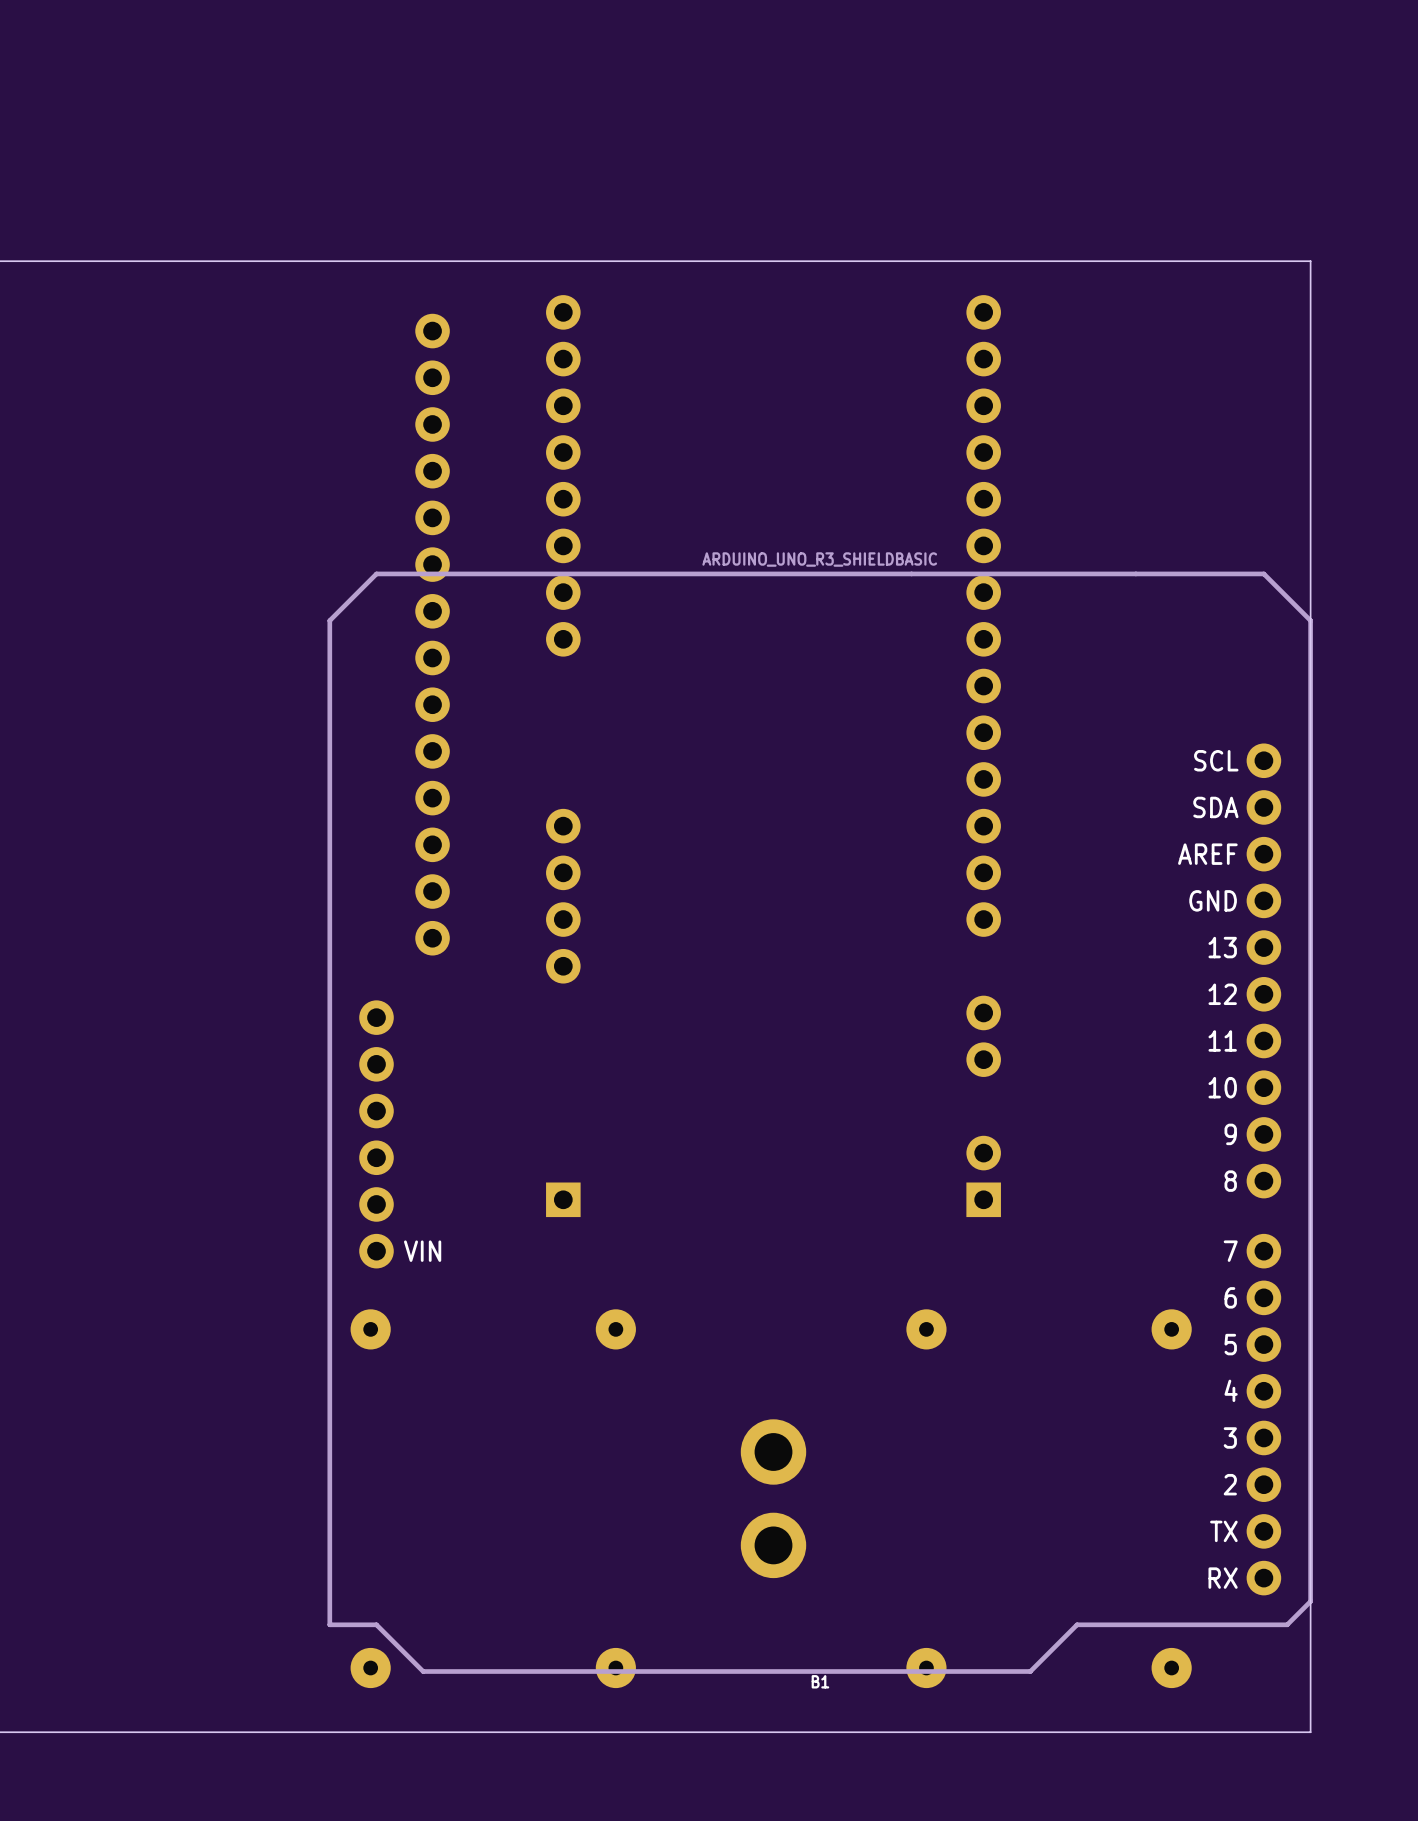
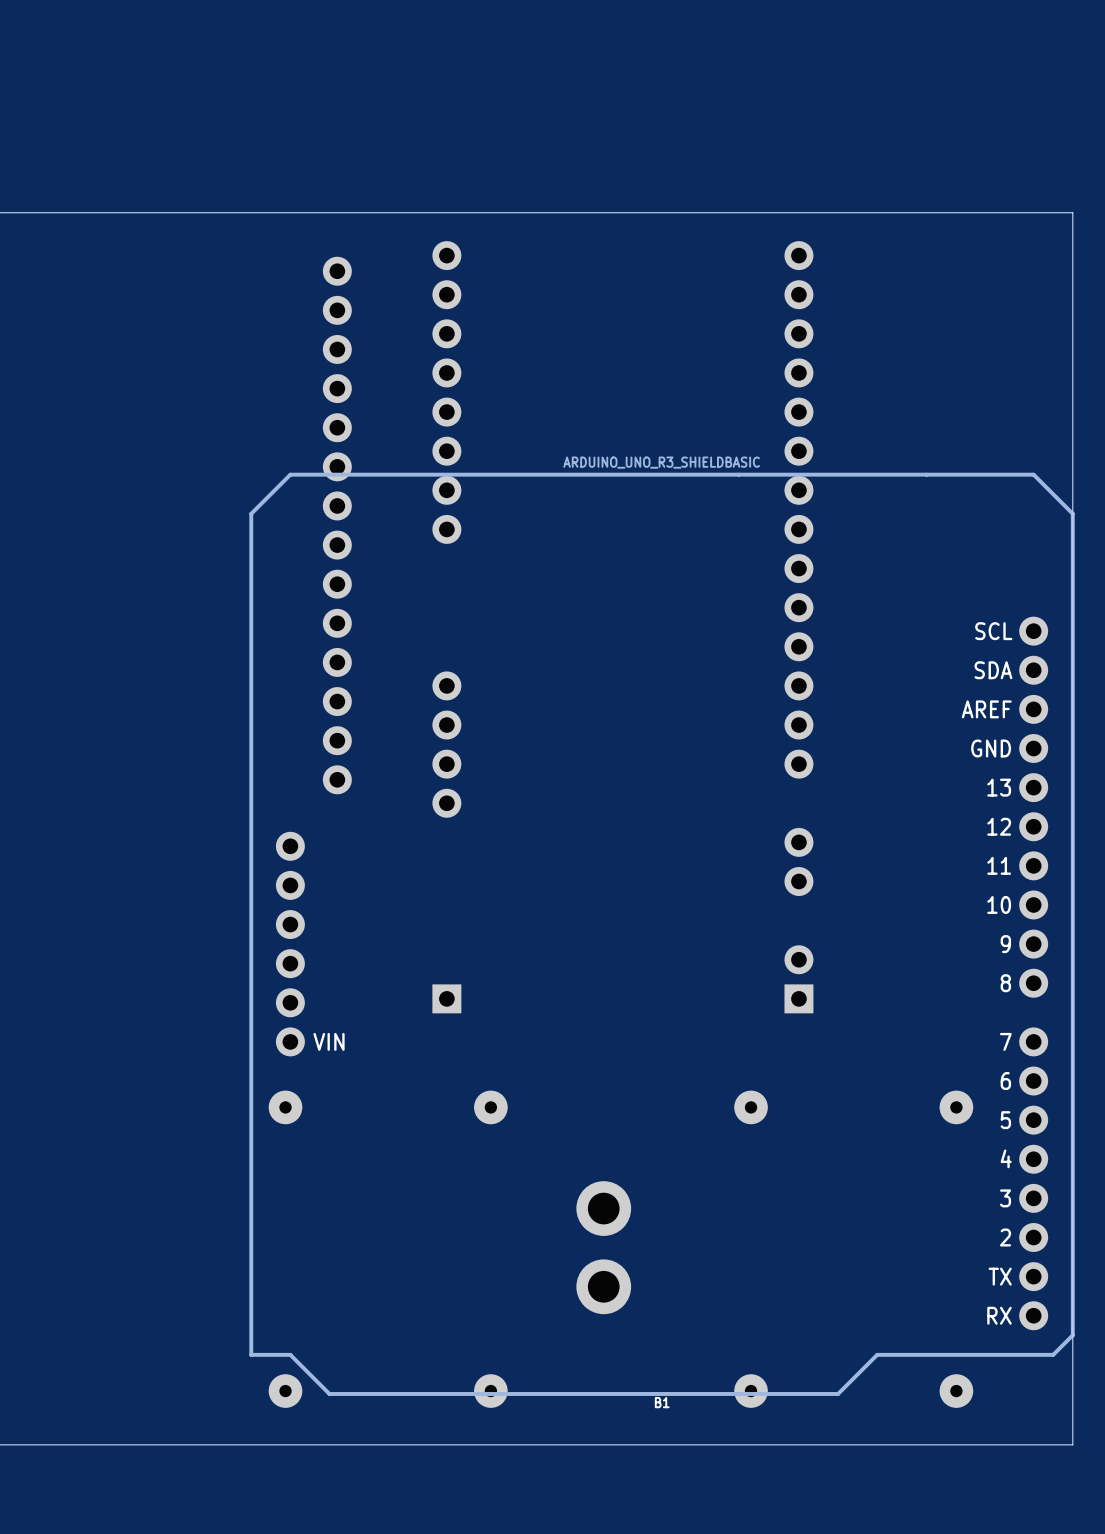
part position: (773, 1498) -> (603, 1247)

